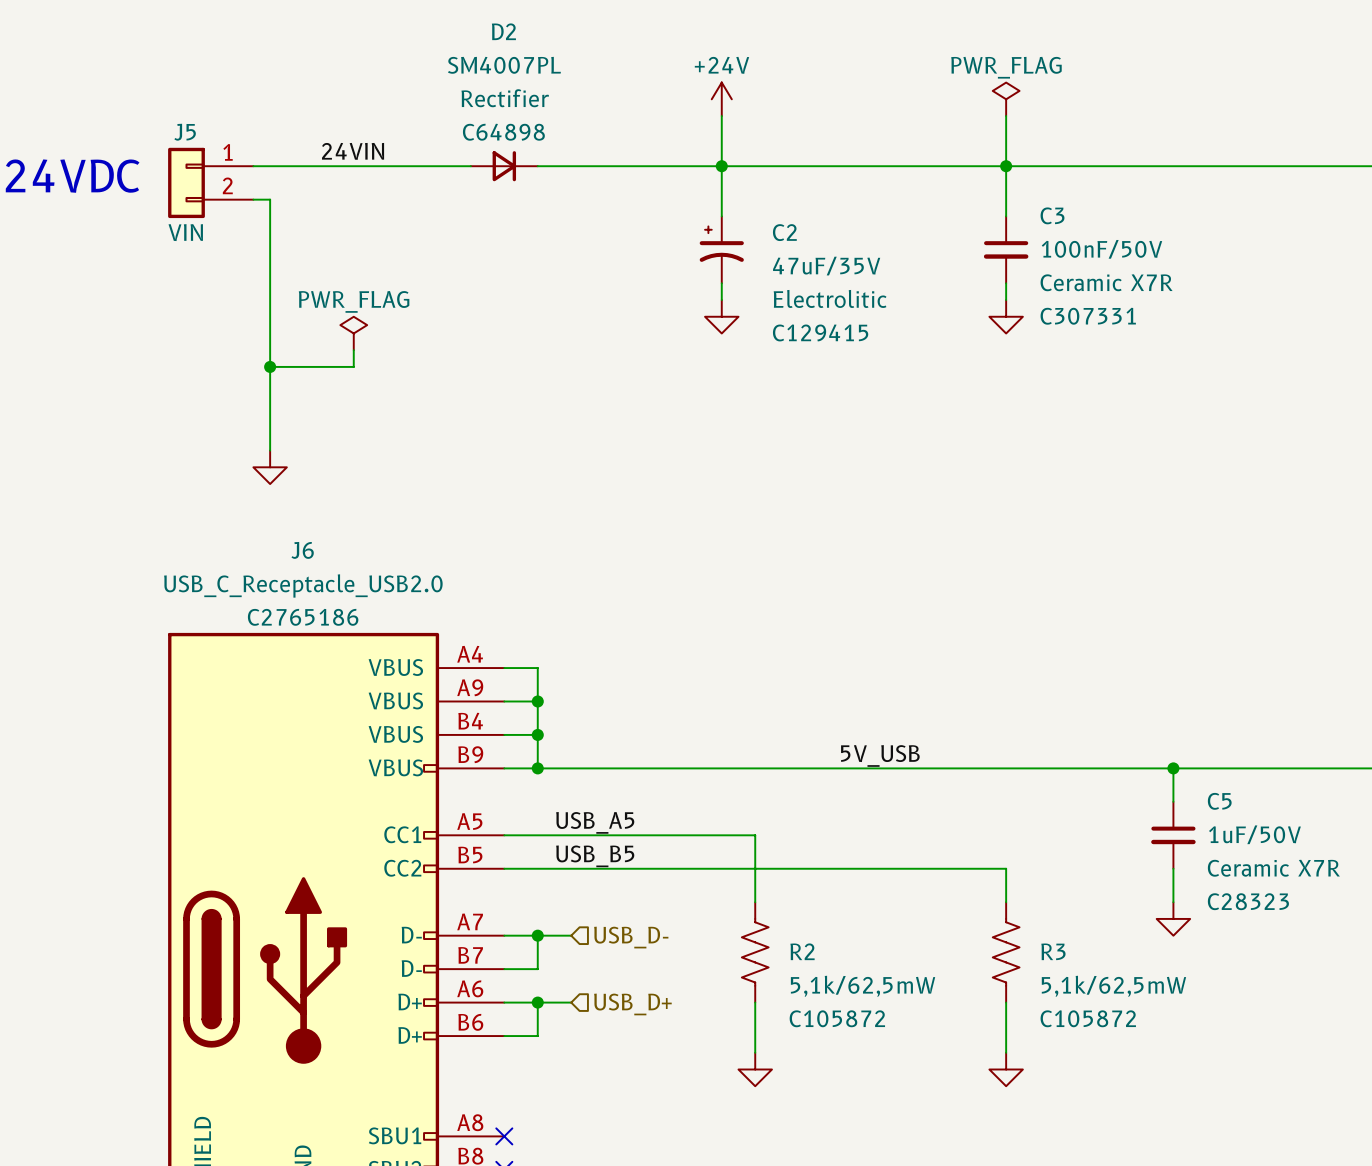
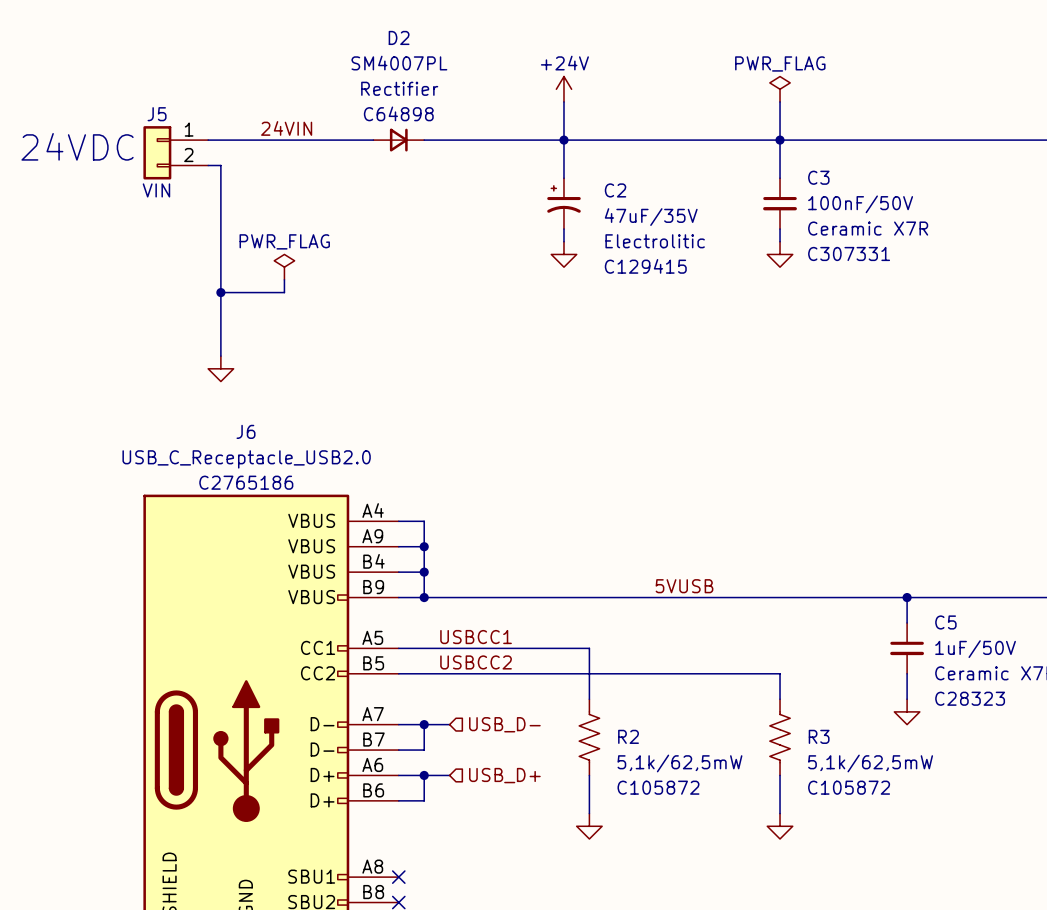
label: 5V_USB (880, 755) -> 5VUSB (684, 586)
label: USB_A5 (595, 822) -> USBCC1 (476, 637)
label: USB_B5 (595, 856) -> USBCC2 (476, 662)

